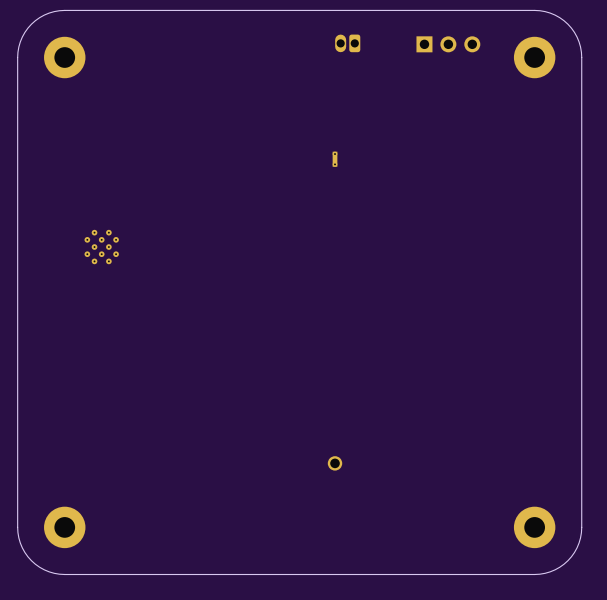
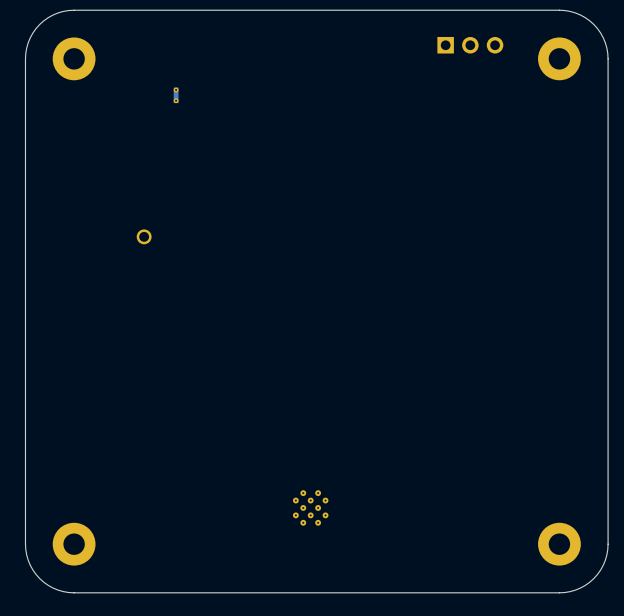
part: (347, 43) -> none
part position: (335, 159) -> (176, 95)
part: none -> (144, 236)
part: (101, 247) -> none
part: (335, 463) -> none
part: none -> (310, 507)

